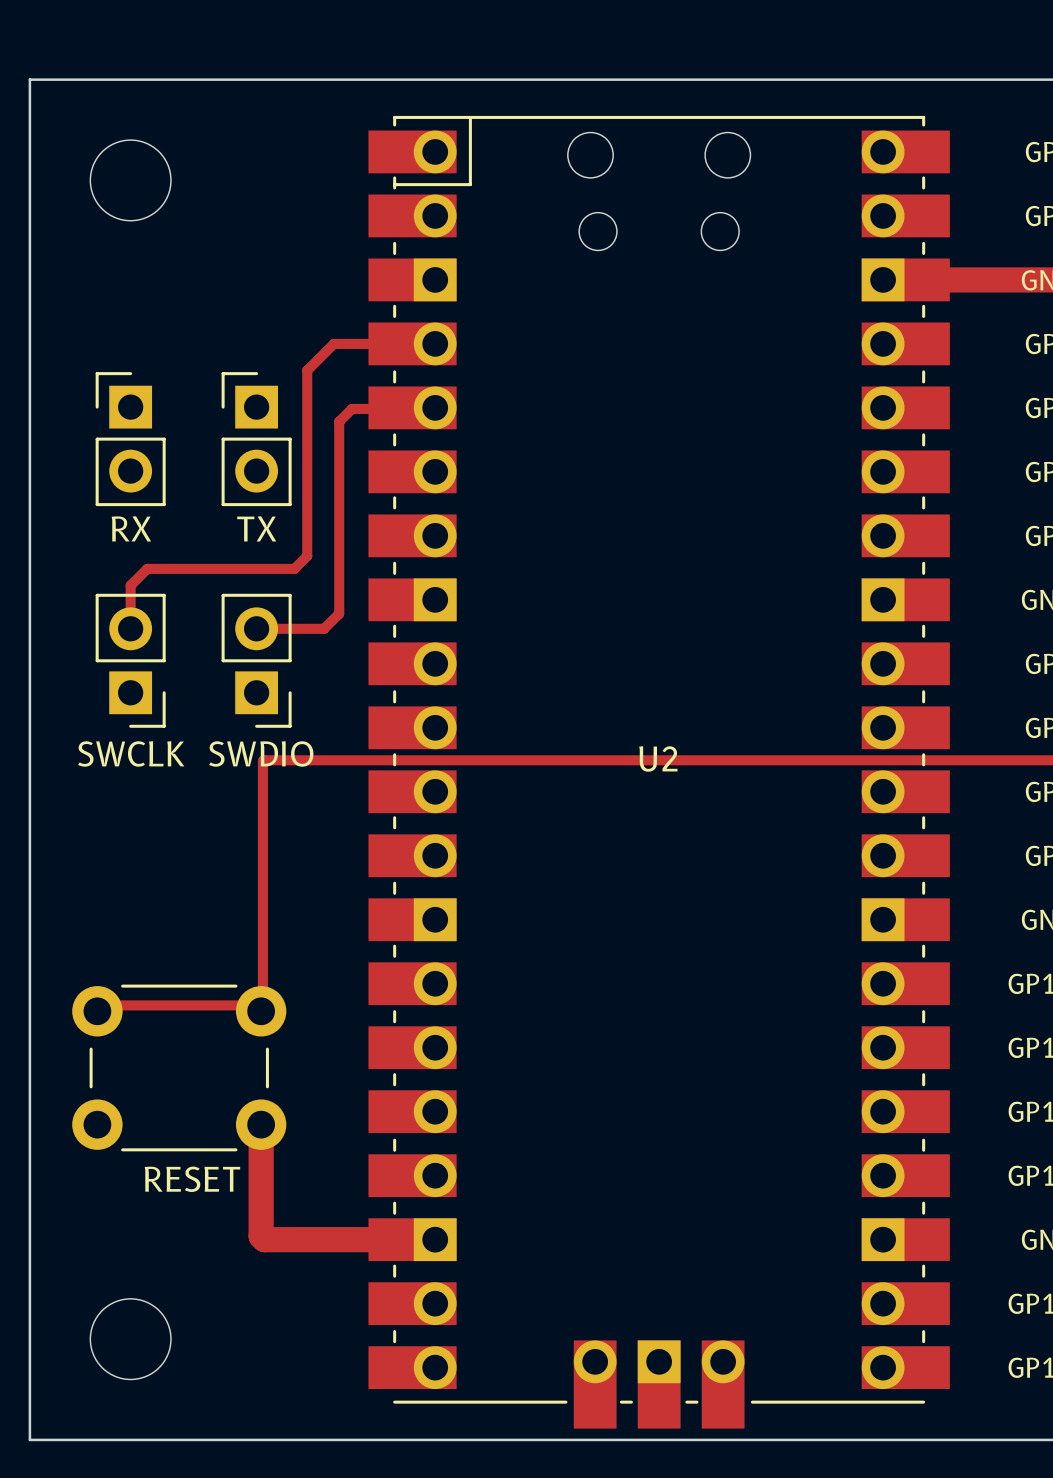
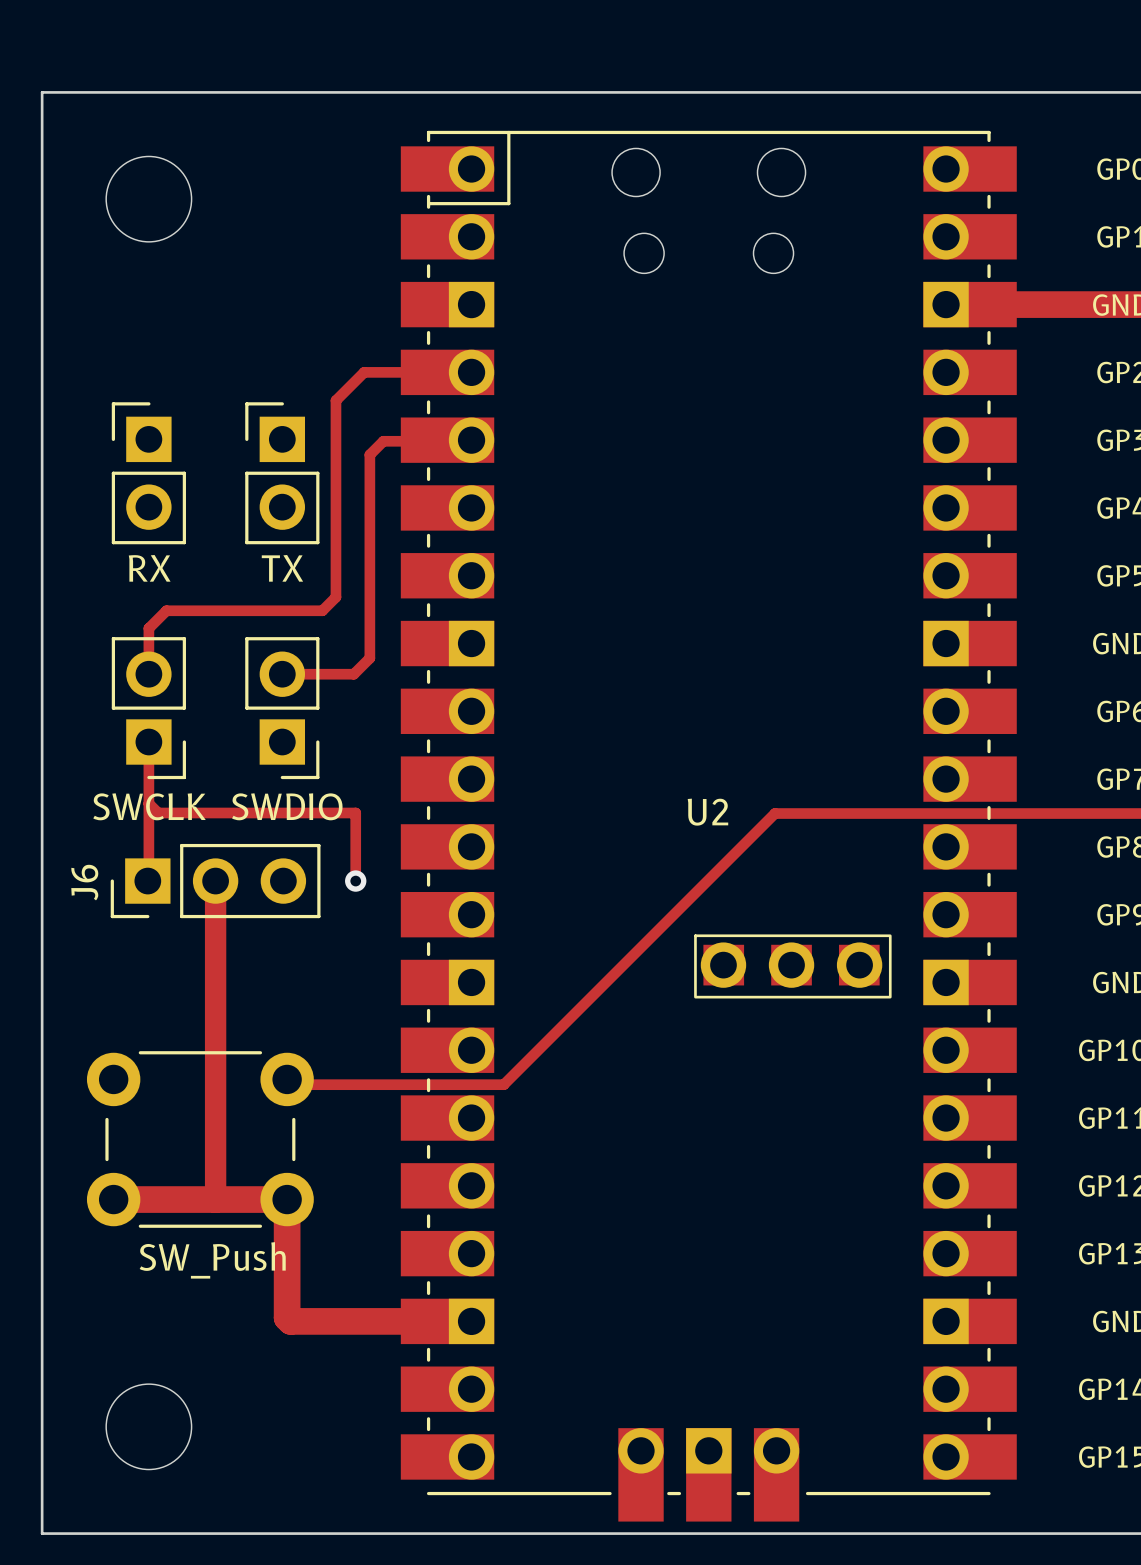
U2 footprint: [368, 115, 950, 1429] -> [400, 130, 1017, 1522]
track: none -> (148, 742) (148, 879)
track: none -> (148, 803) (158, 813) (355, 813) (355, 881)
track: (263, 760) (721, 760) -> (287, 1079) (292, 1084) (503, 1084) (774, 813)
track: (263, 760) (262, 1005) (99, 1005) -> none
track: none -> (215, 881) (215, 1199)
J6: none -> (215, 881)
via: none -> (355, 881)
track: none -> (113, 1199) (287, 1199)
part value: RESET (192, 1179) -> SW_Push (212, 1260)

